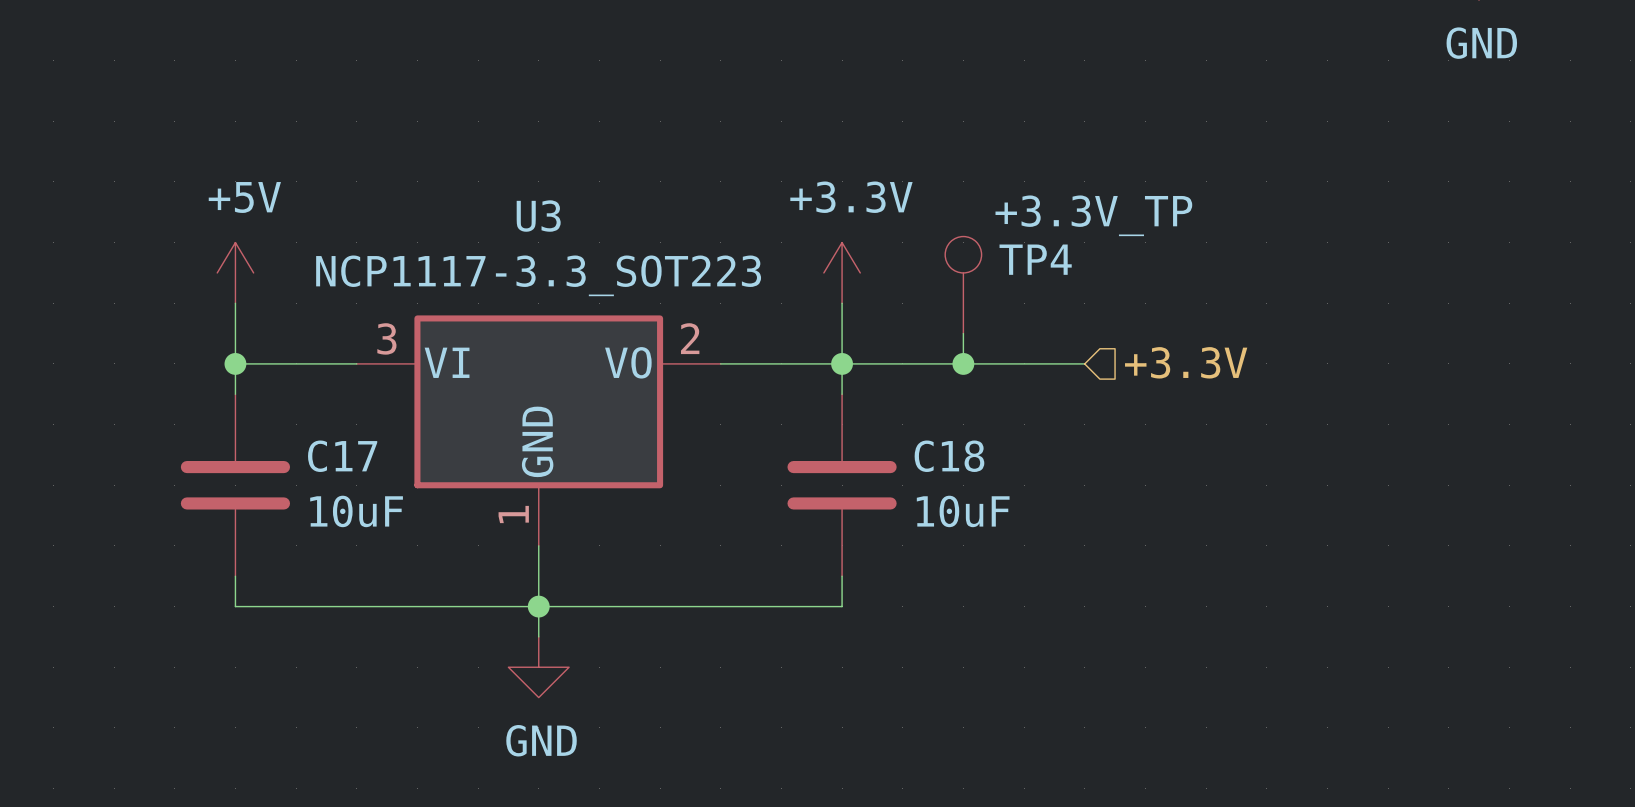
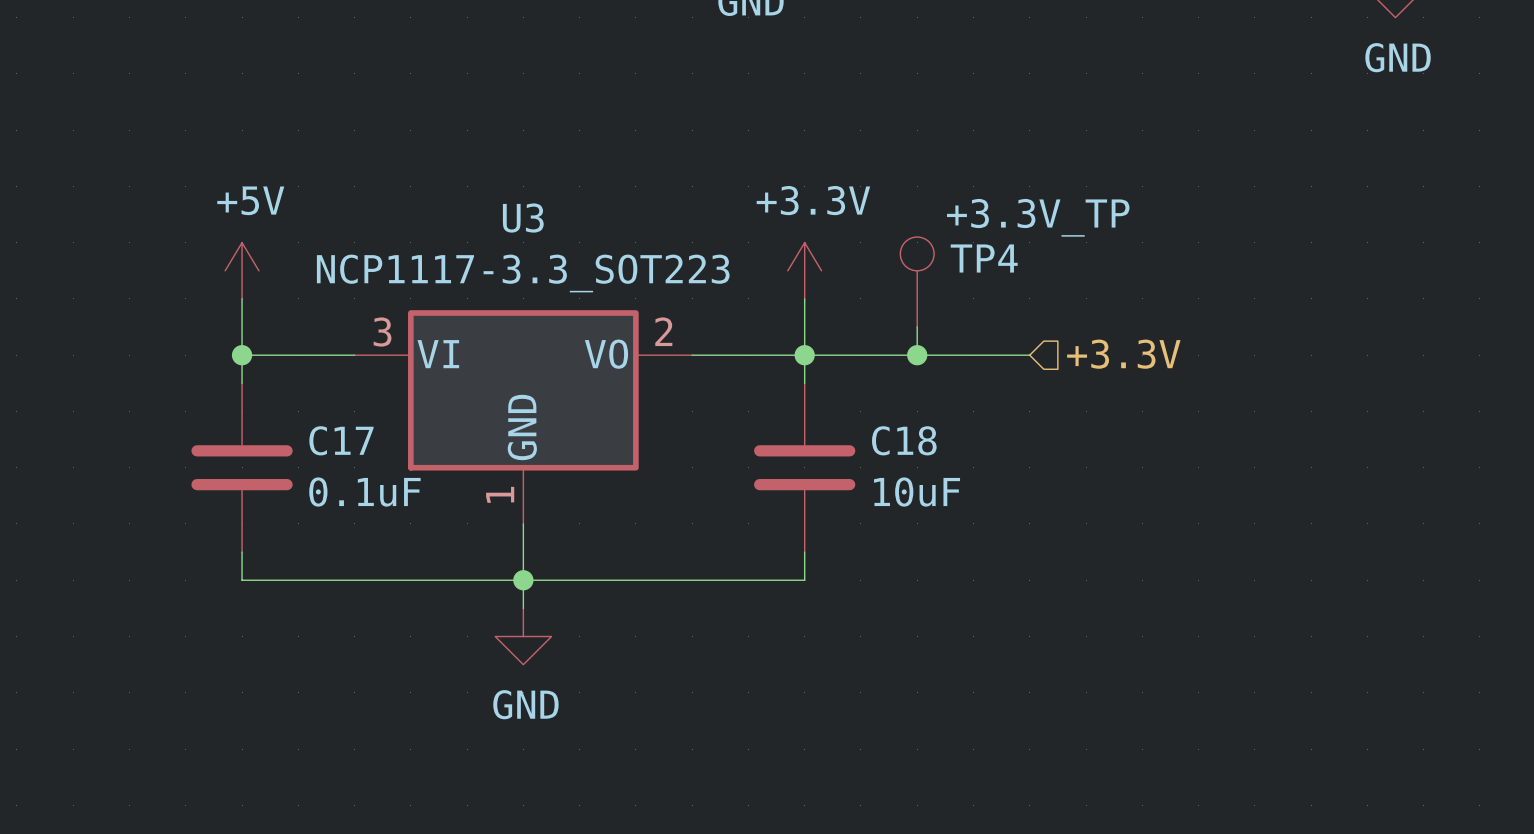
C17 value: 10uF (356, 511) -> 0.1uF (364, 492)

